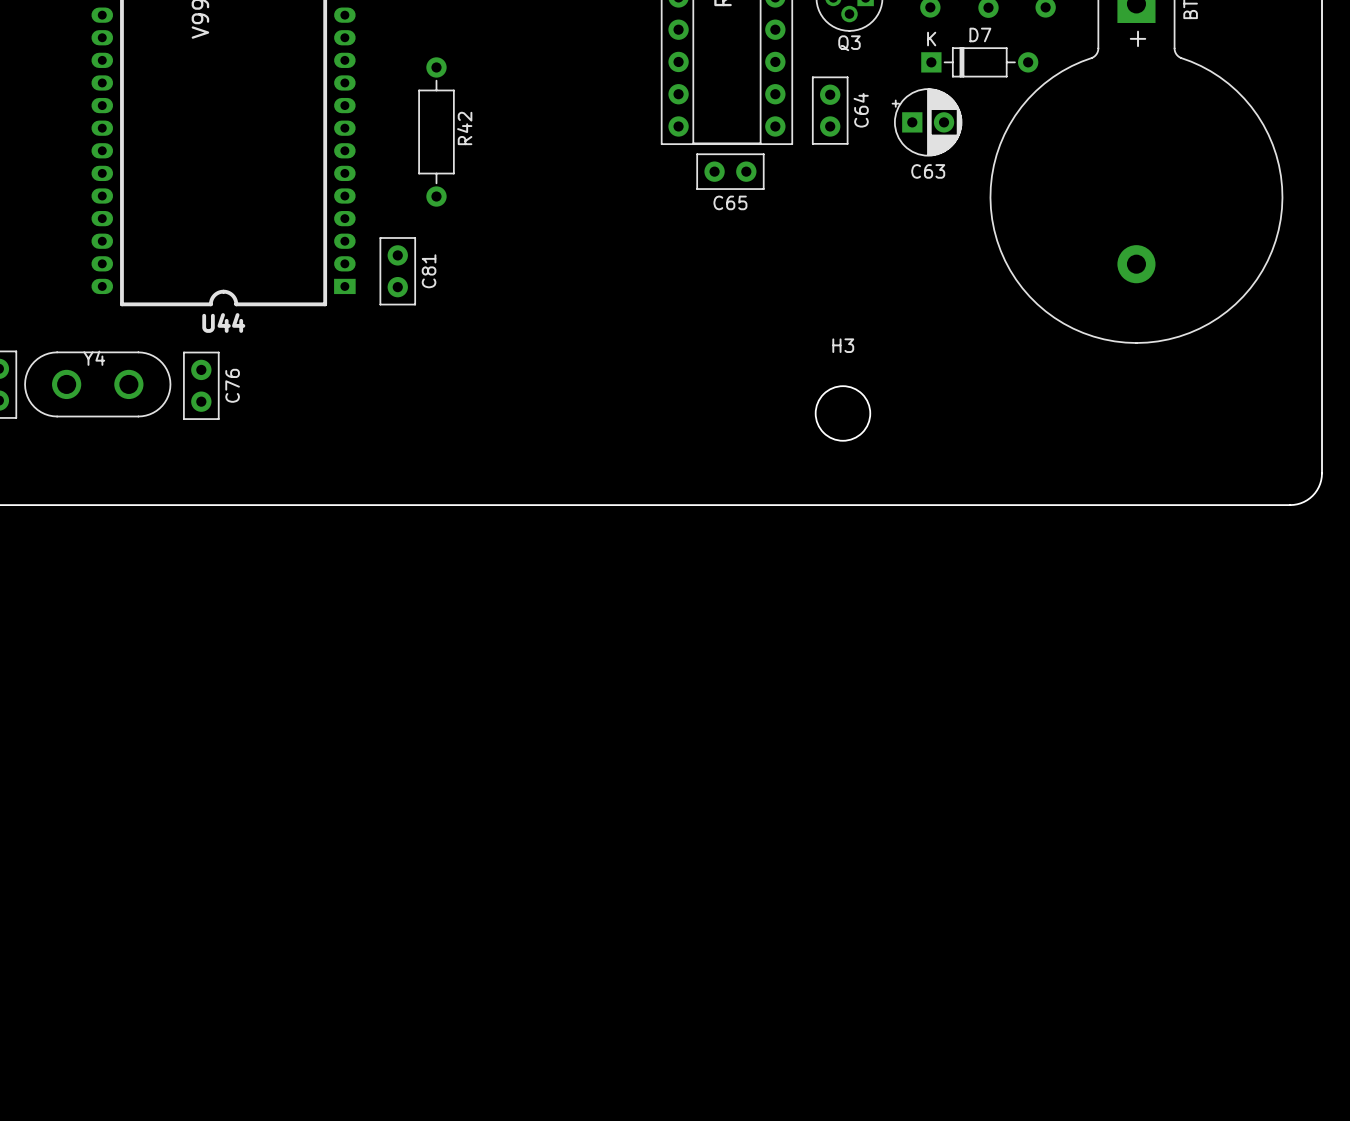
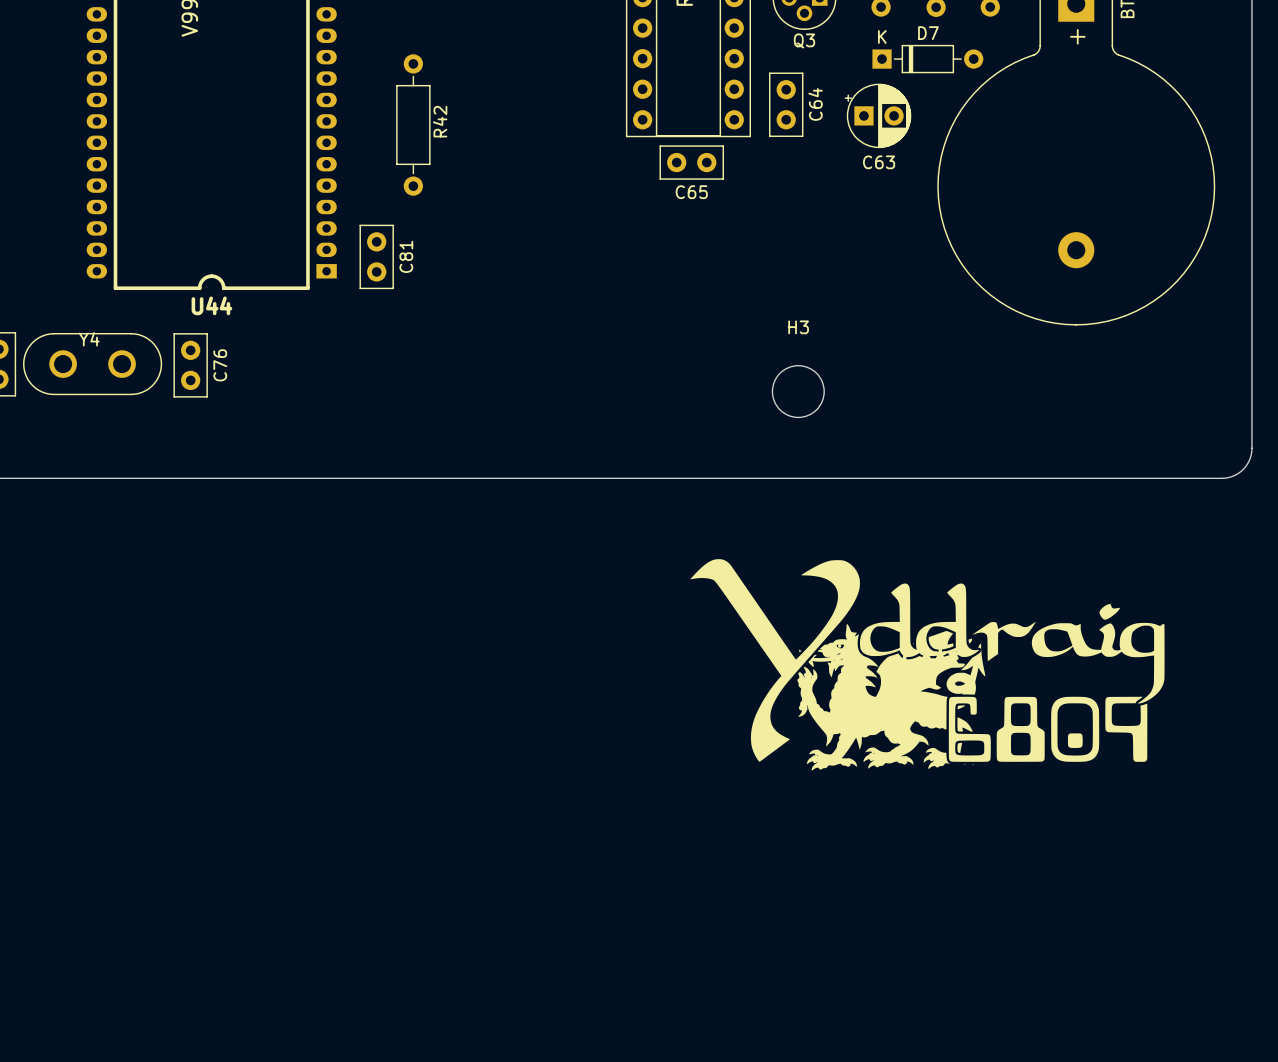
part: none -> (927, 664)

